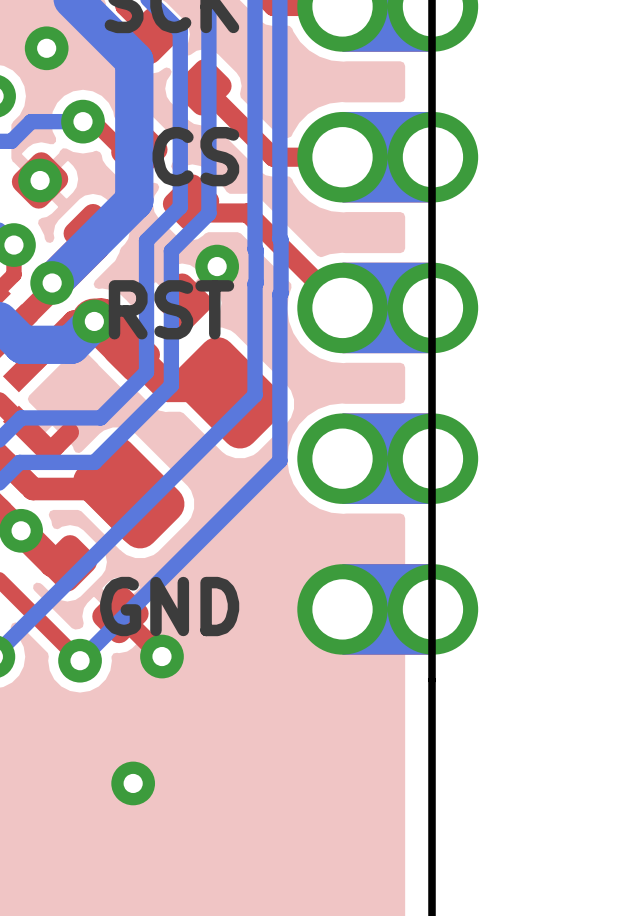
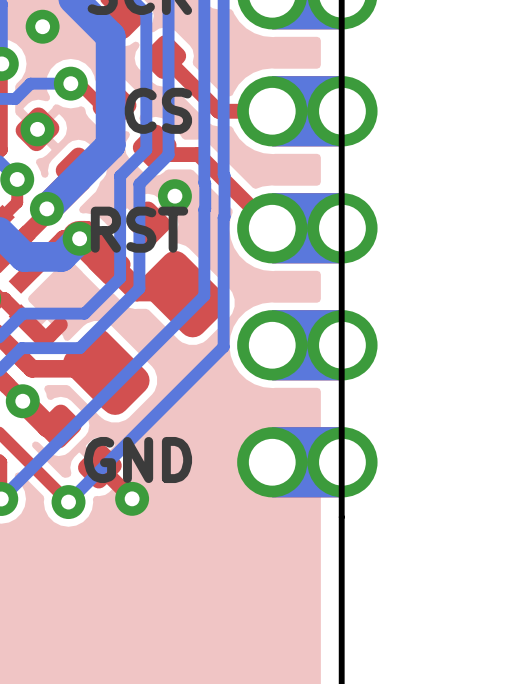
via: (133, 783) -> none

